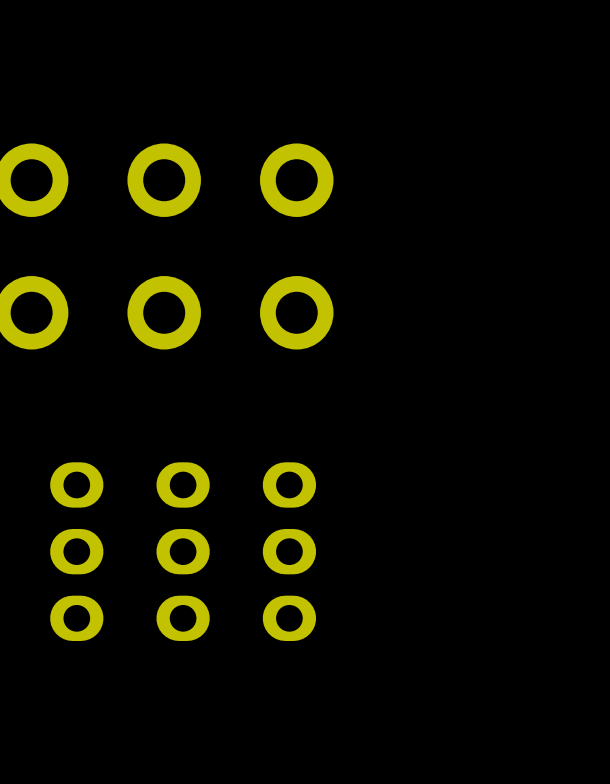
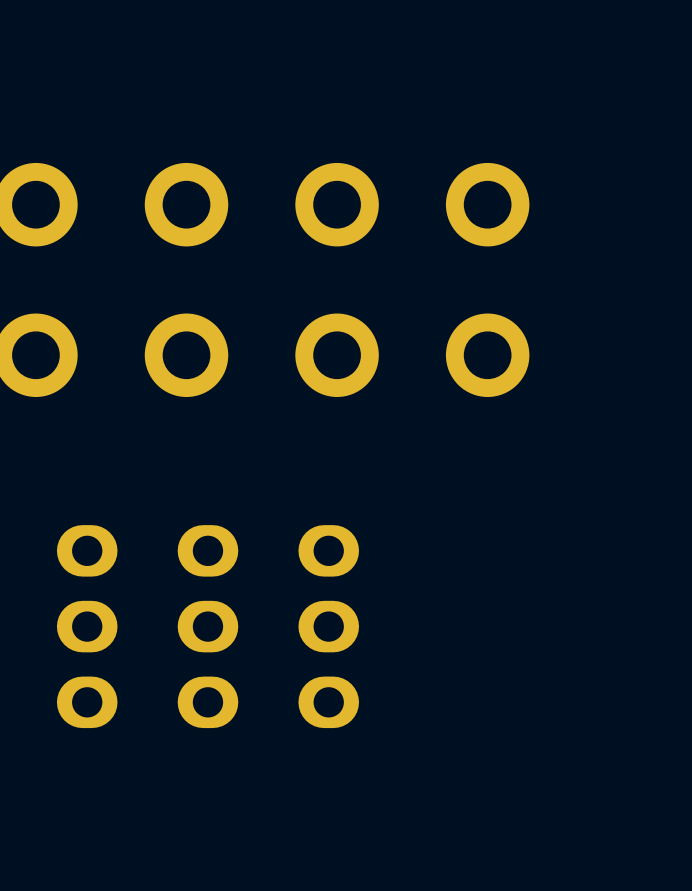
part: none -> (487, 204)
part: none -> (487, 355)

